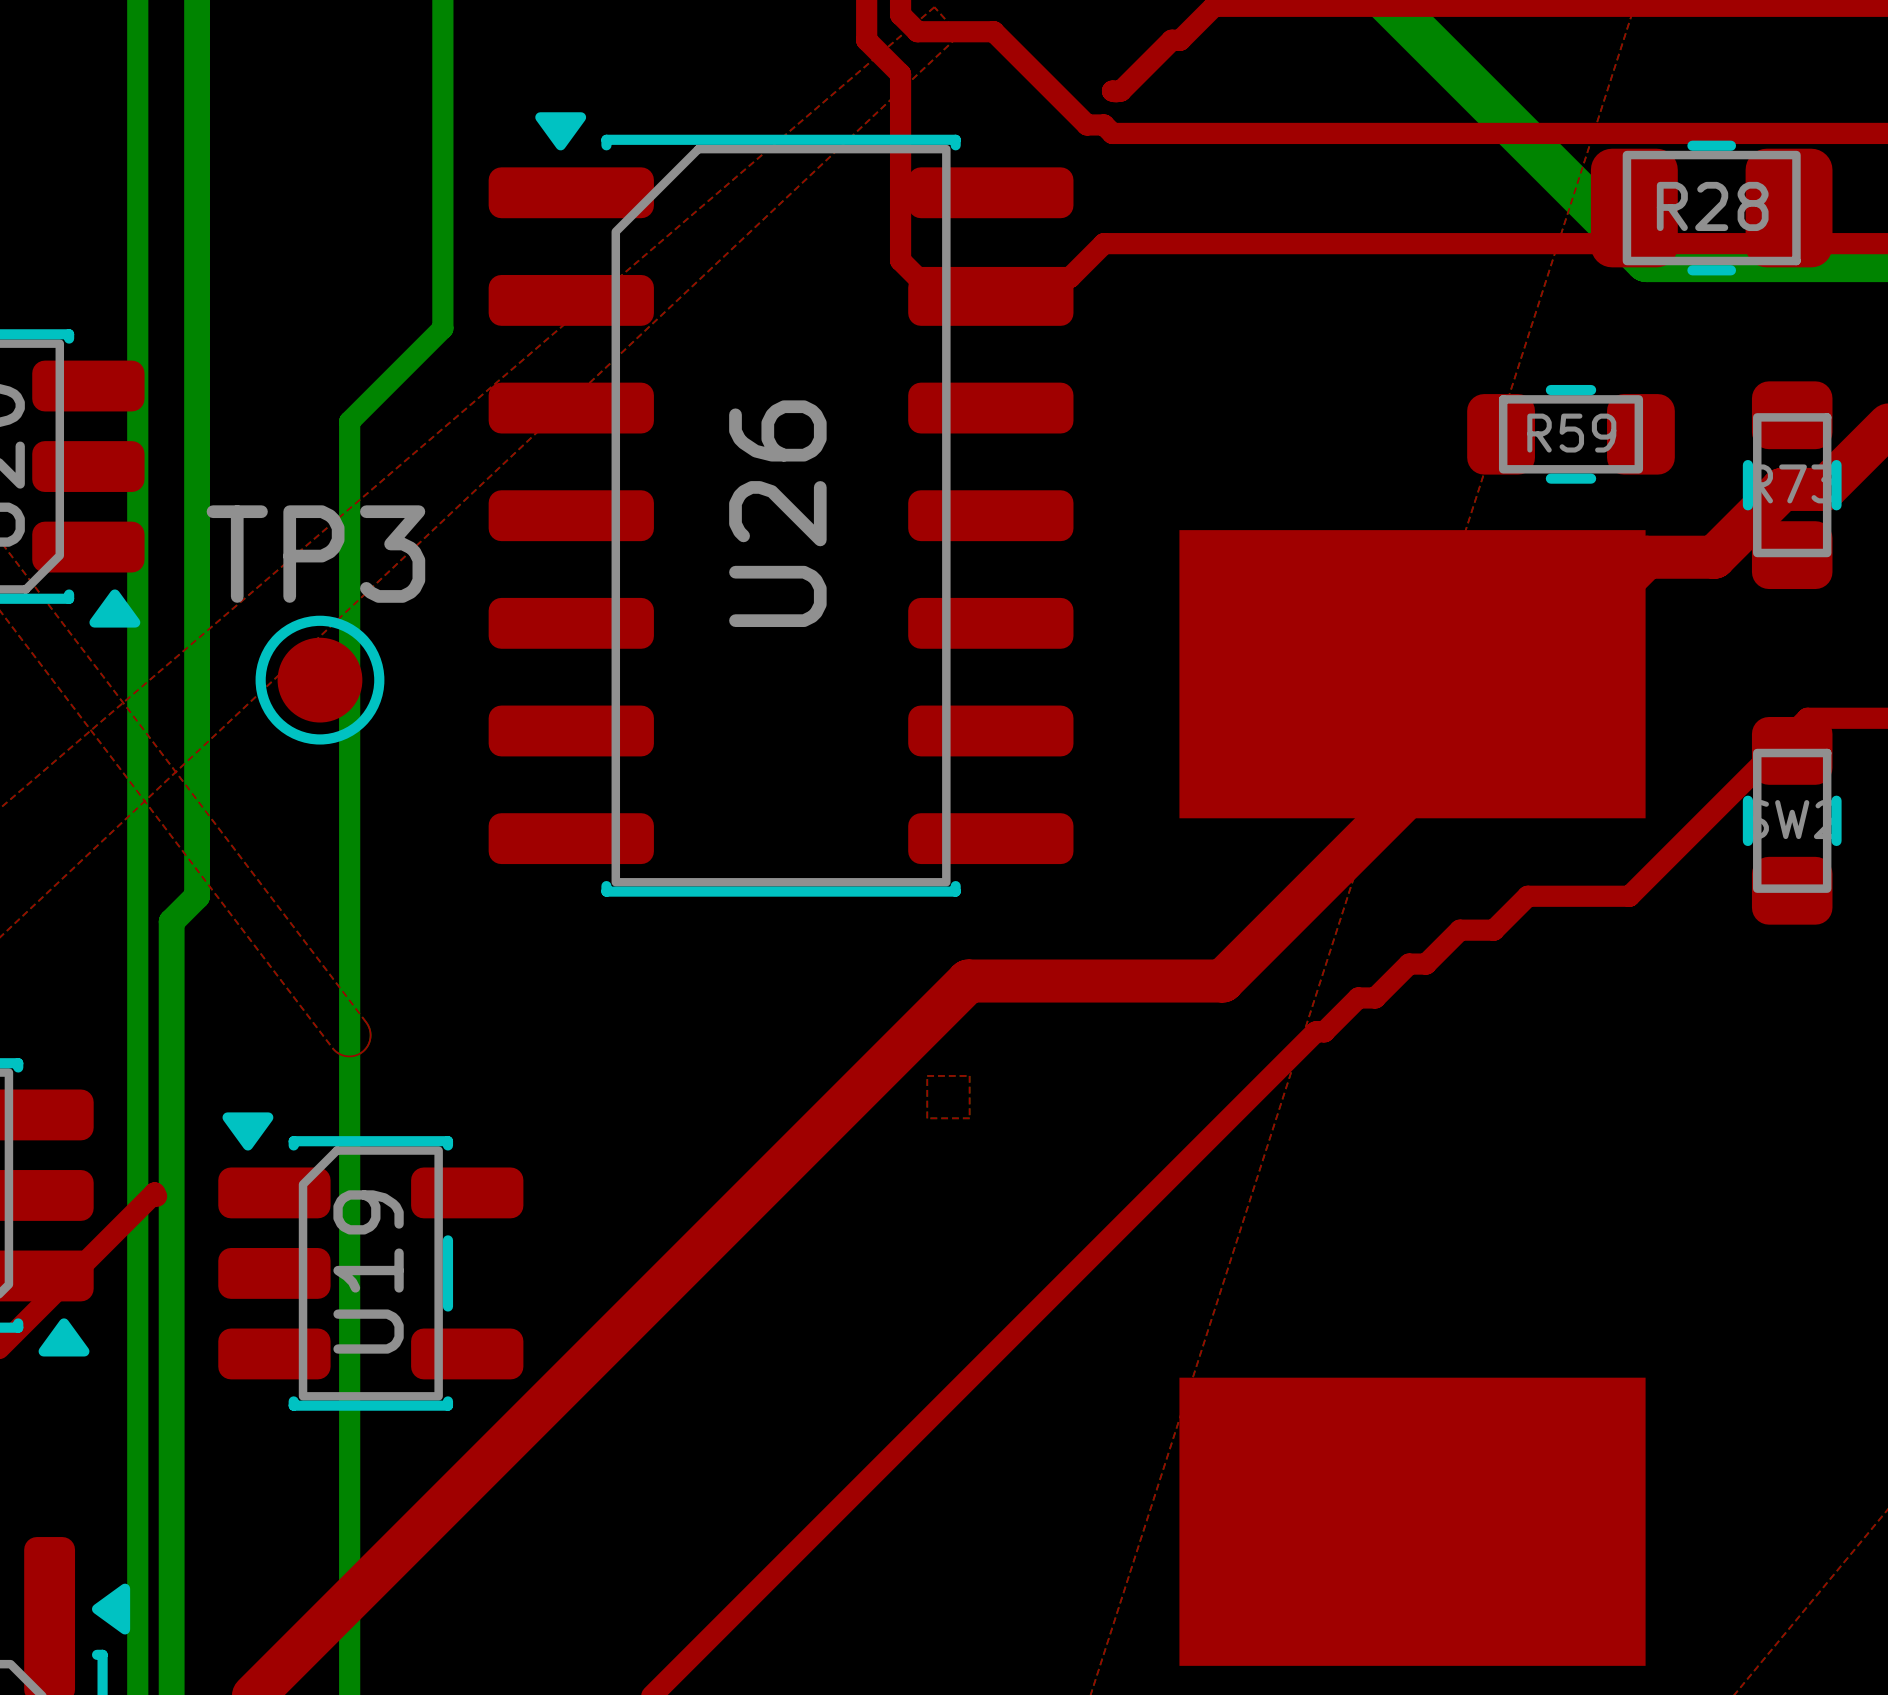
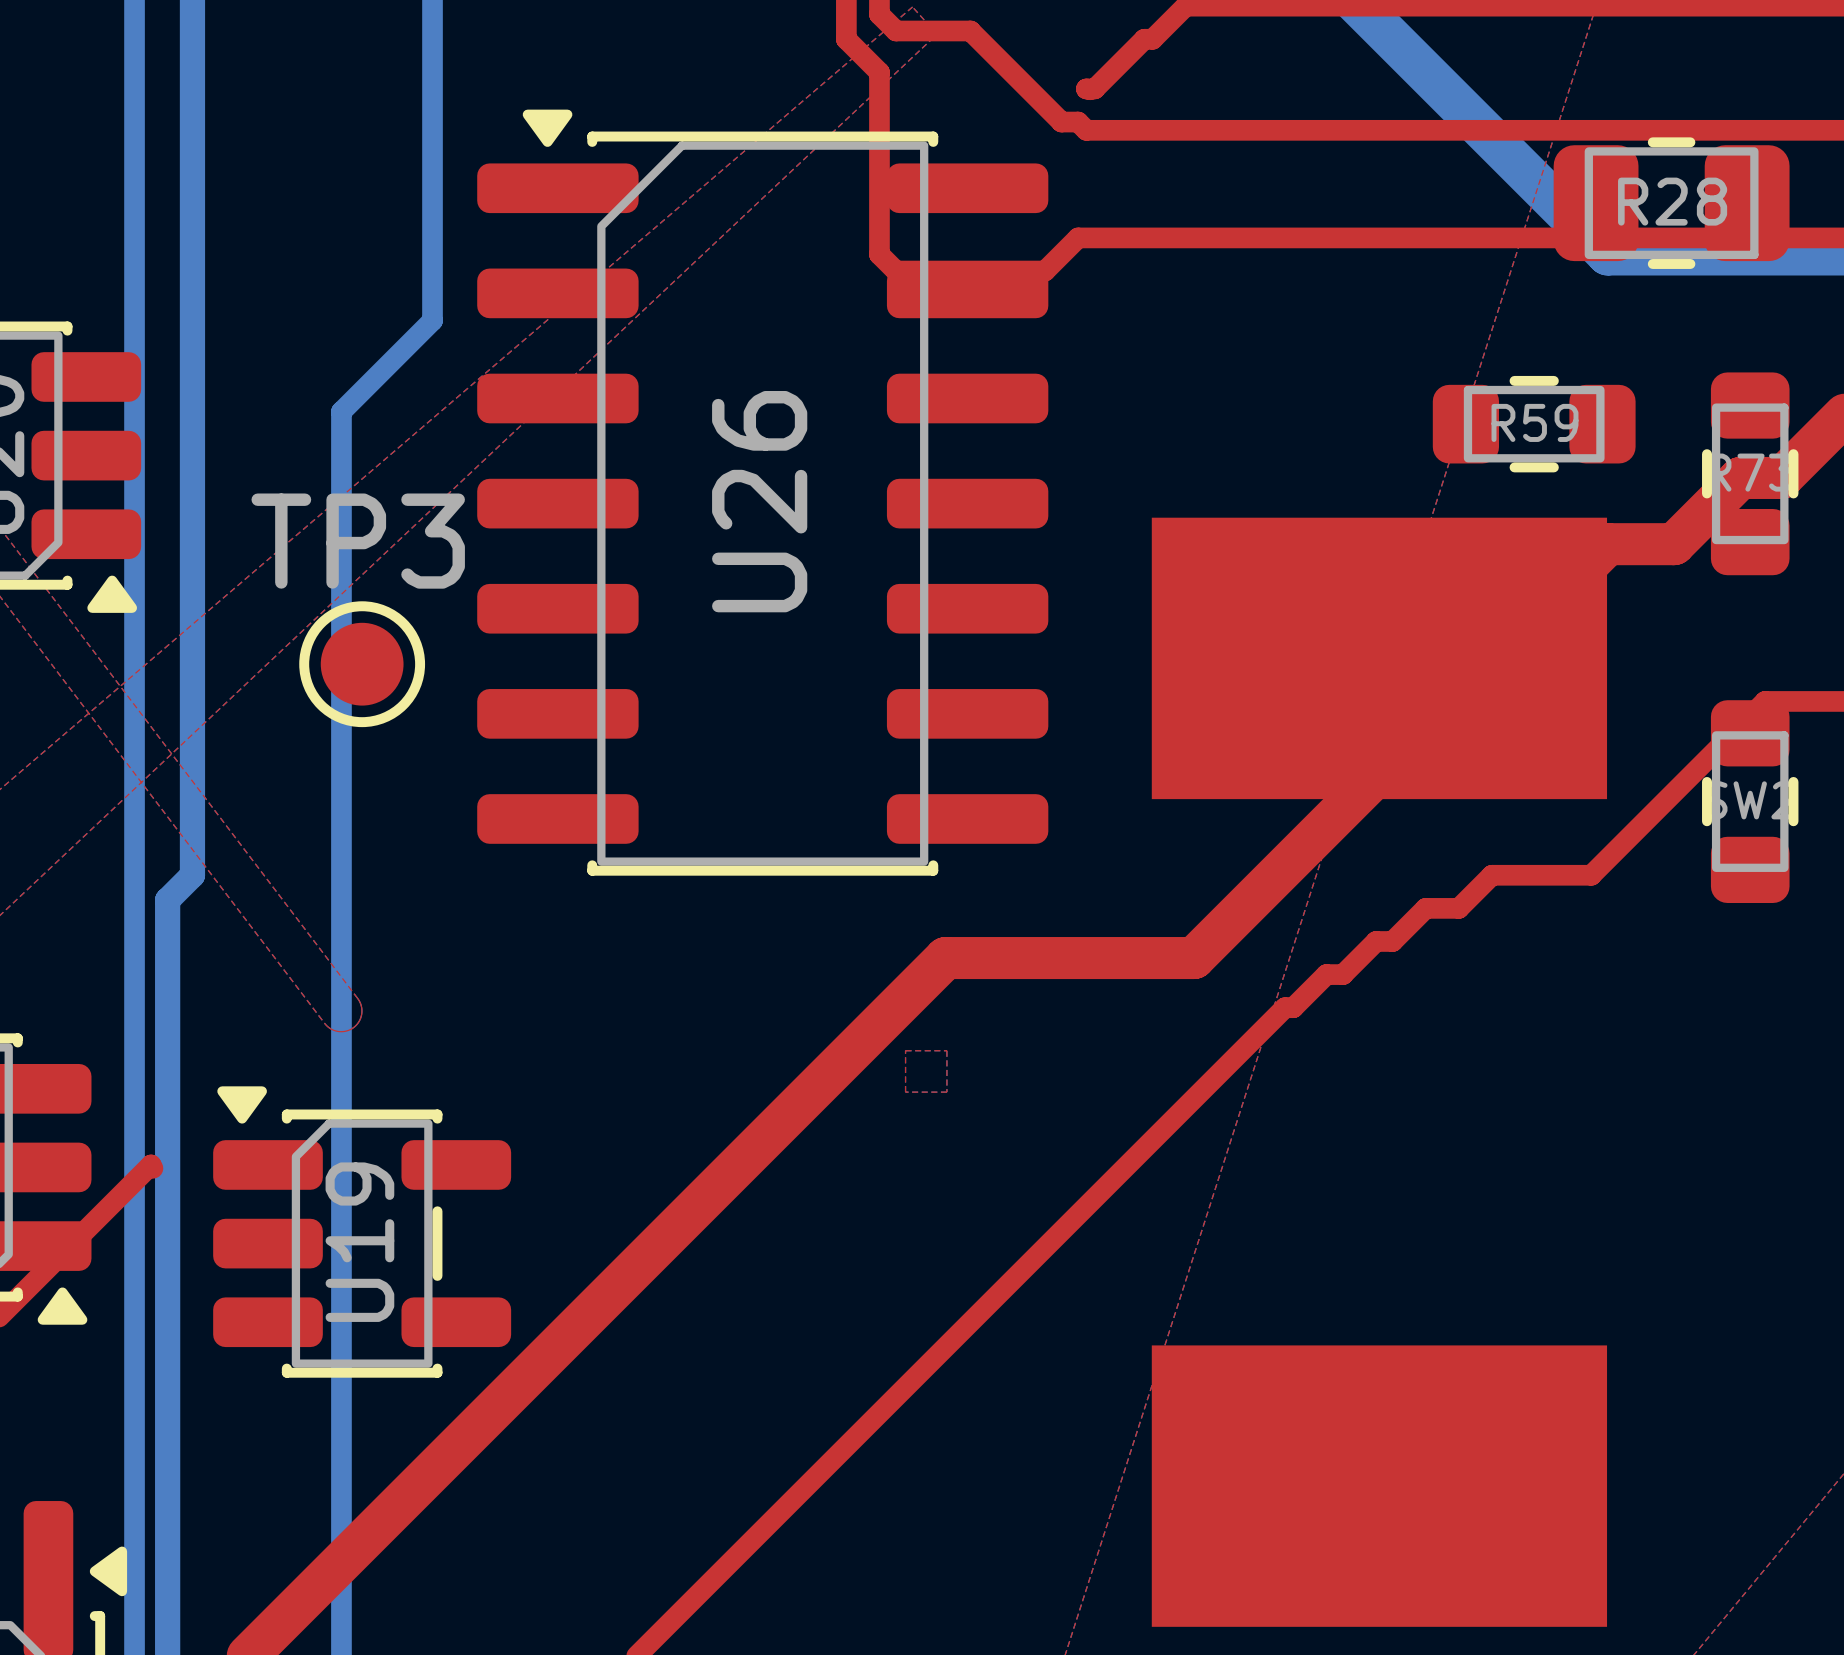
TP3 position: (319, 680) -> (362, 664)

